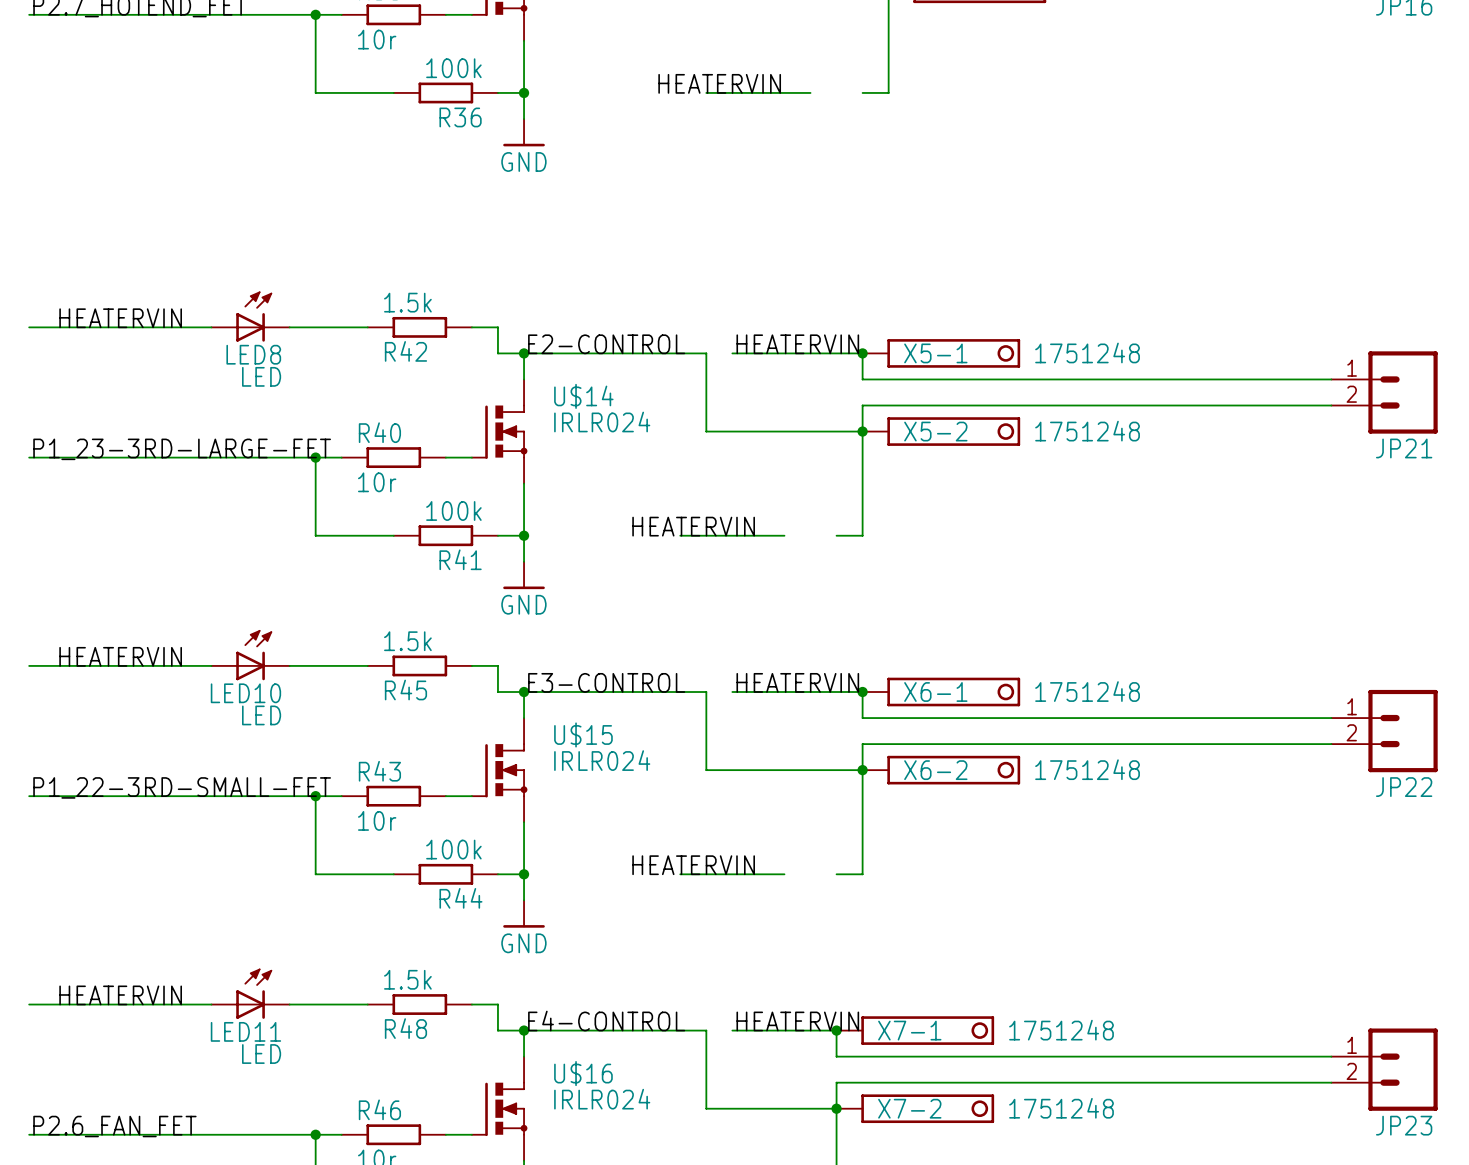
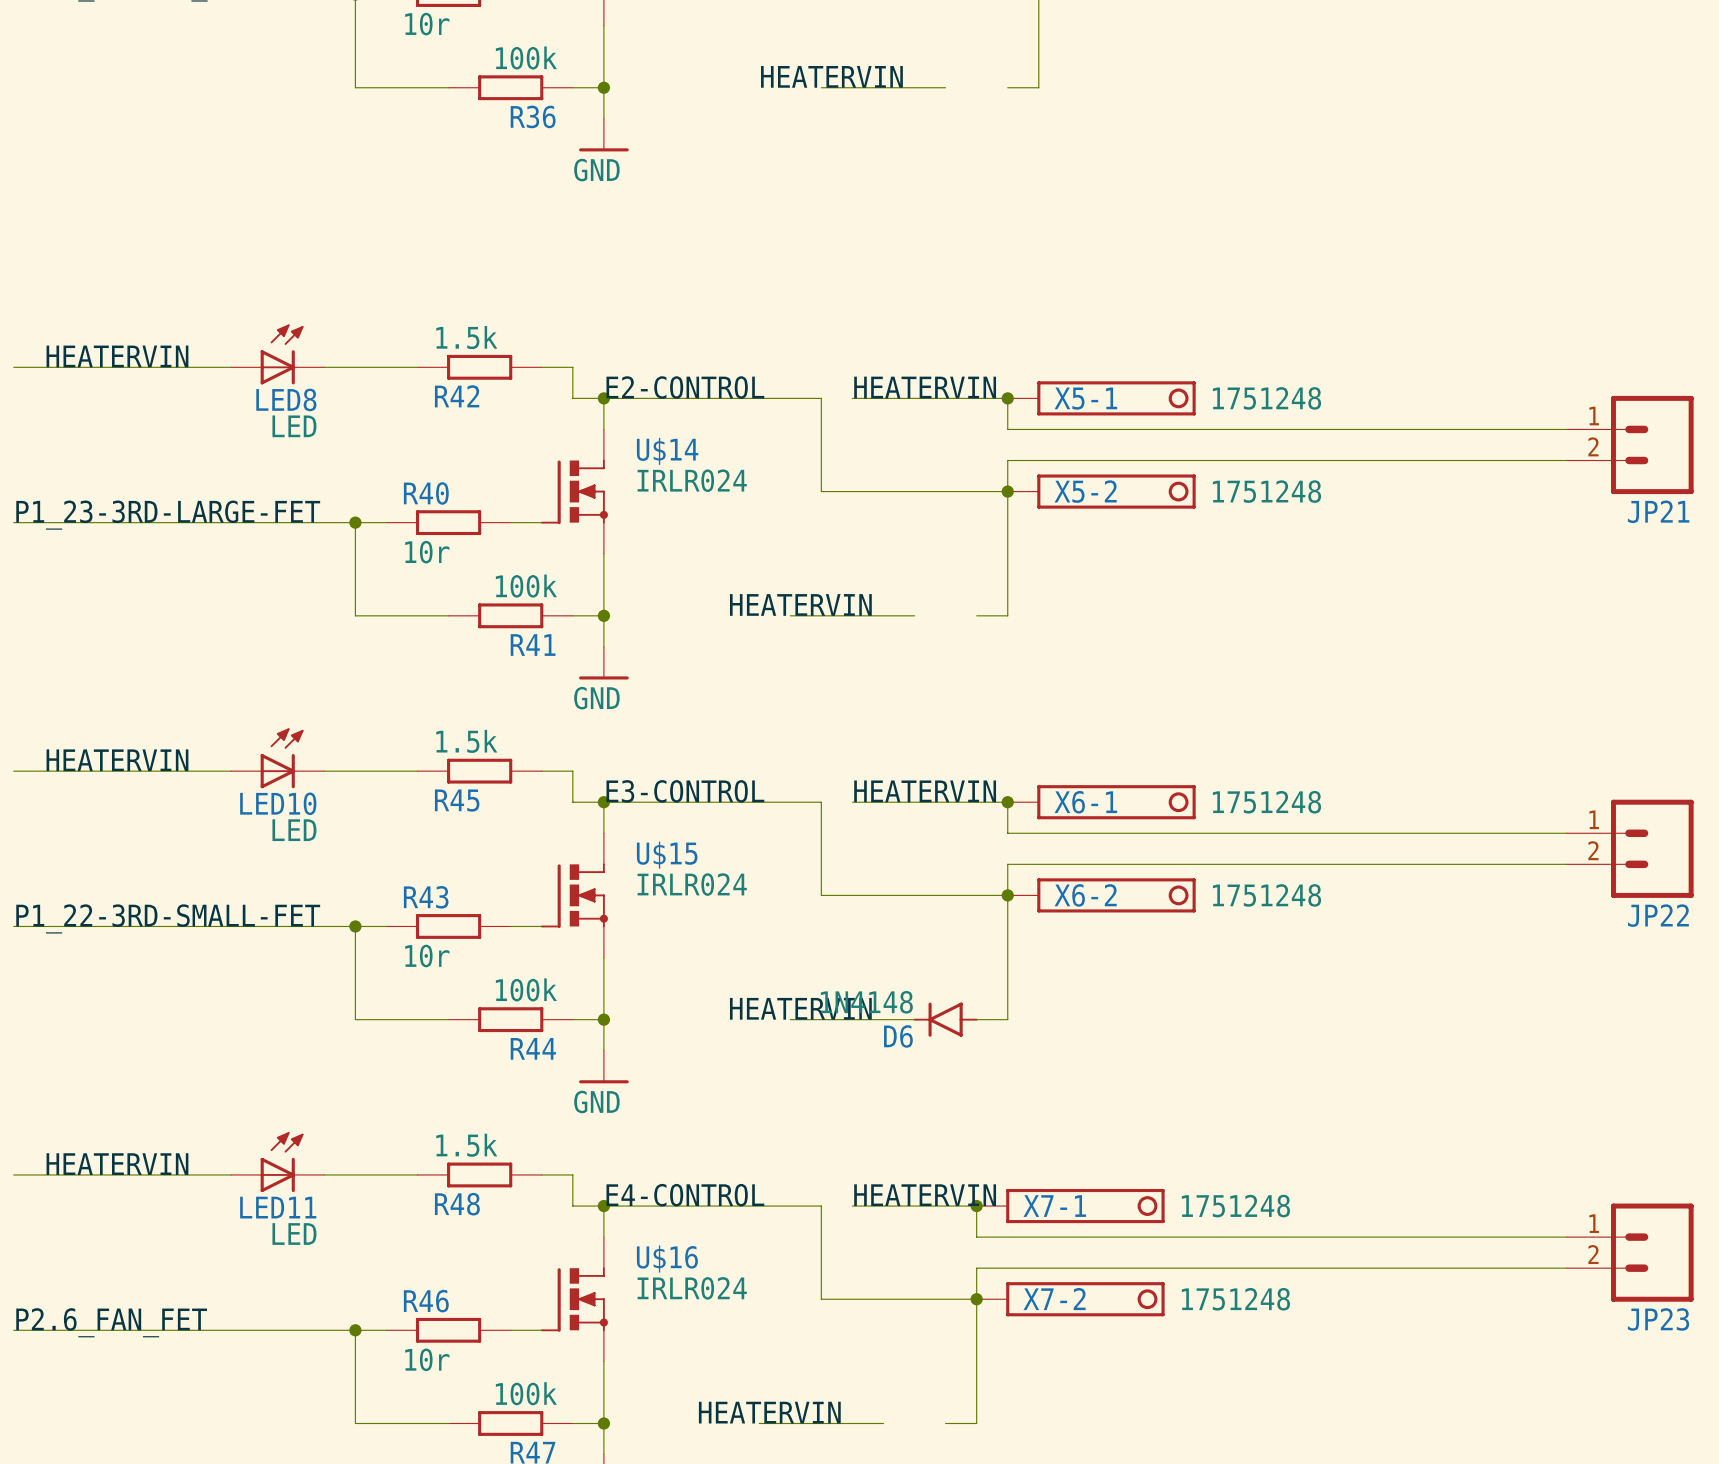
D6: none -> 1N4148 (945, 1019)

